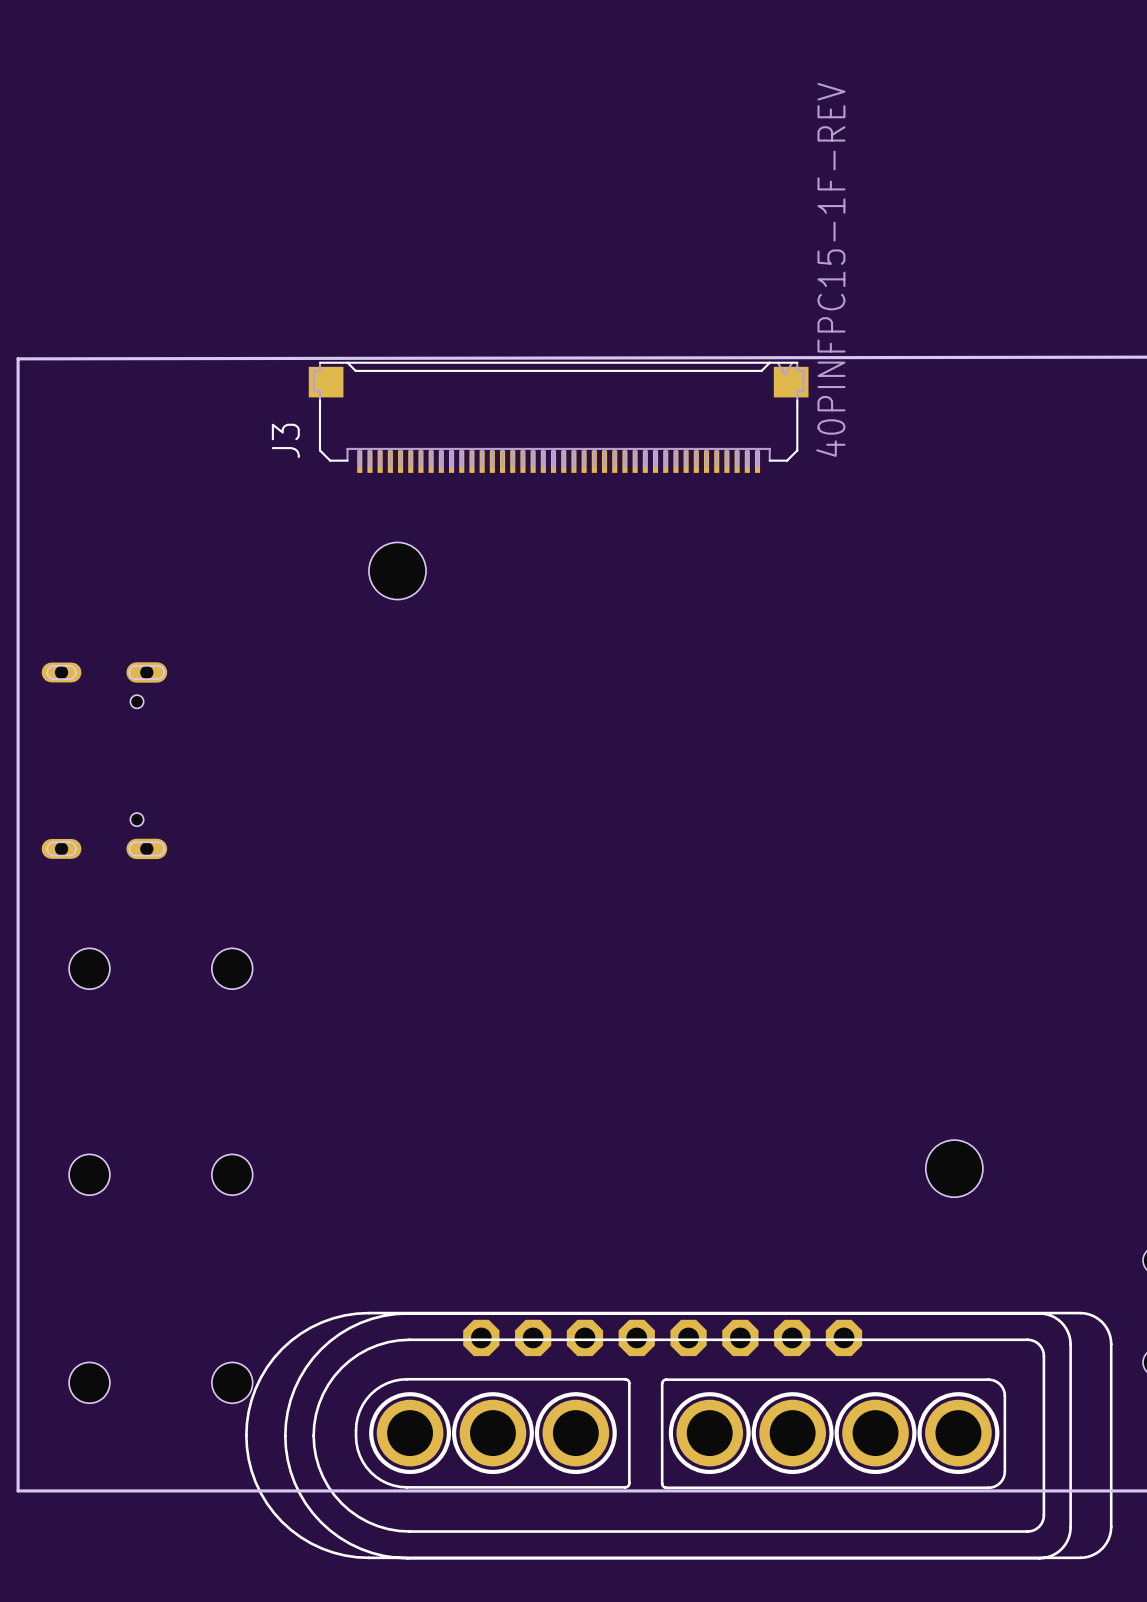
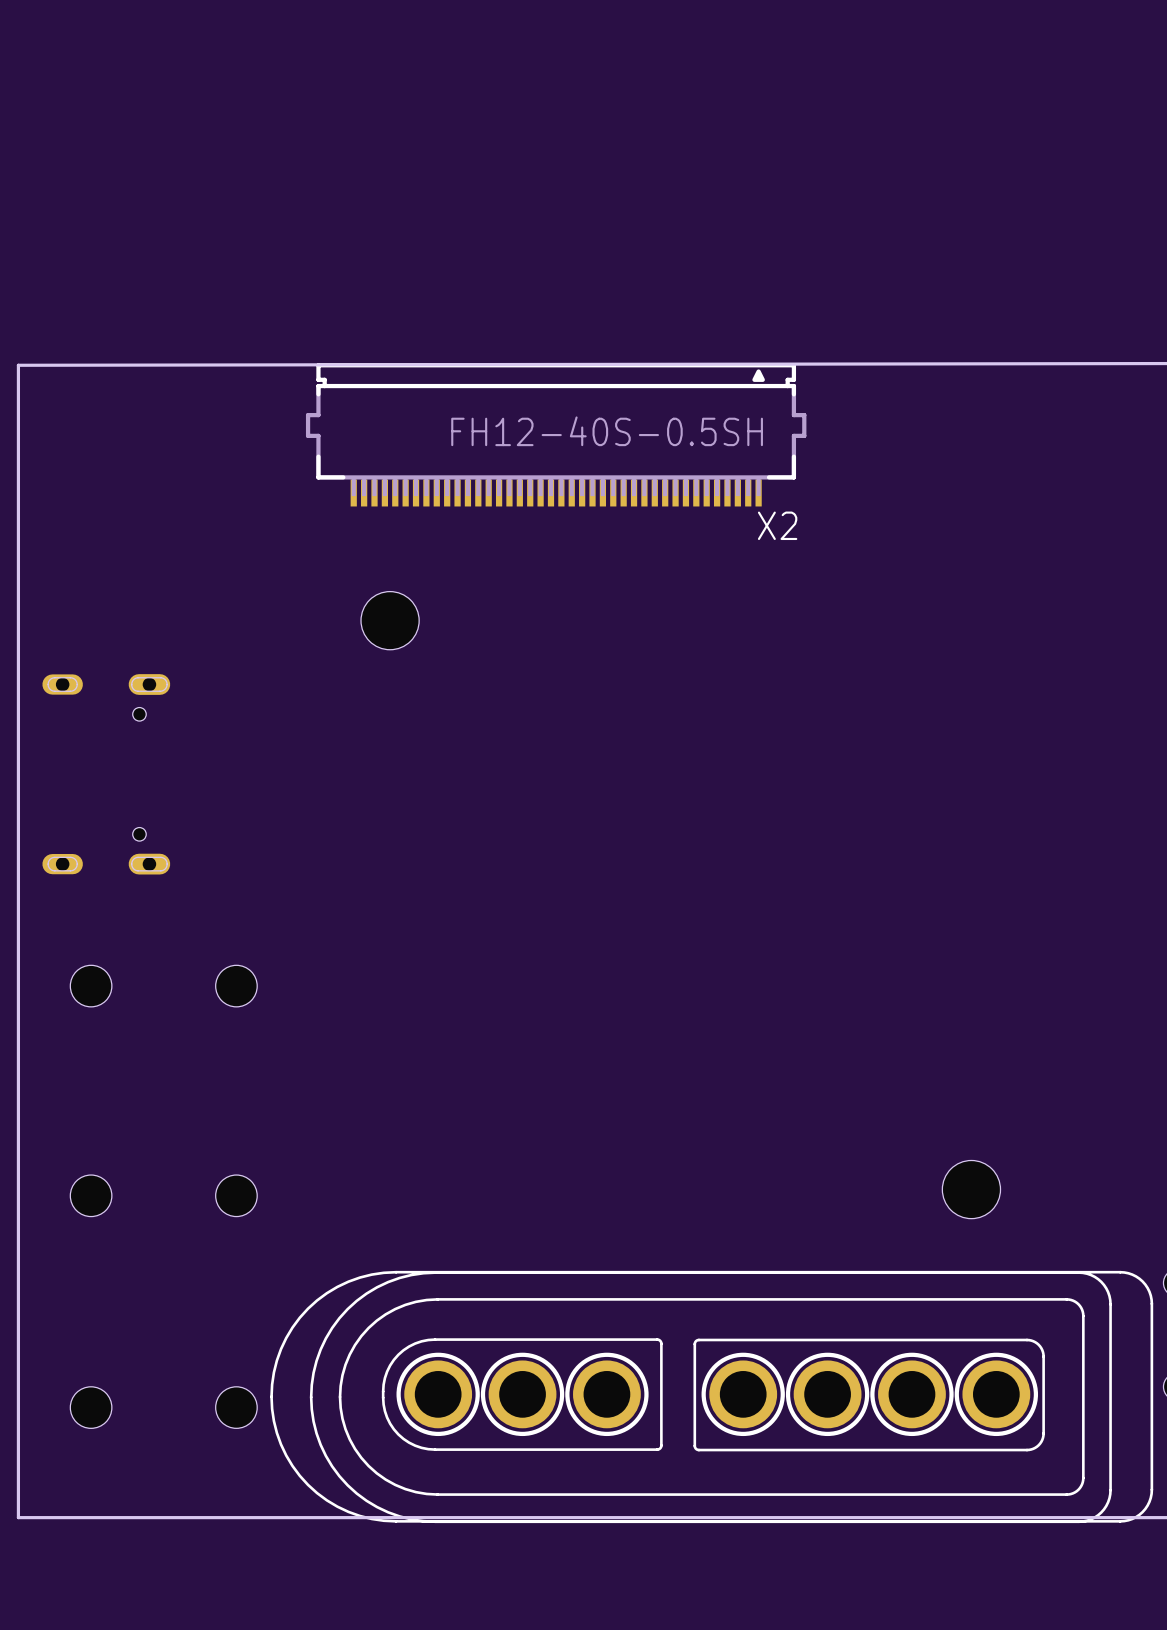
J3: 40PINFPC15-1F-REV (558, 417) -> none
X2: none -> FH12-40S-0.5SH (556, 434)
part position: (397, 571) -> (390, 620)
part: (662, 1337) -> none
part position: (678, 1435) -> (711, 1396)

